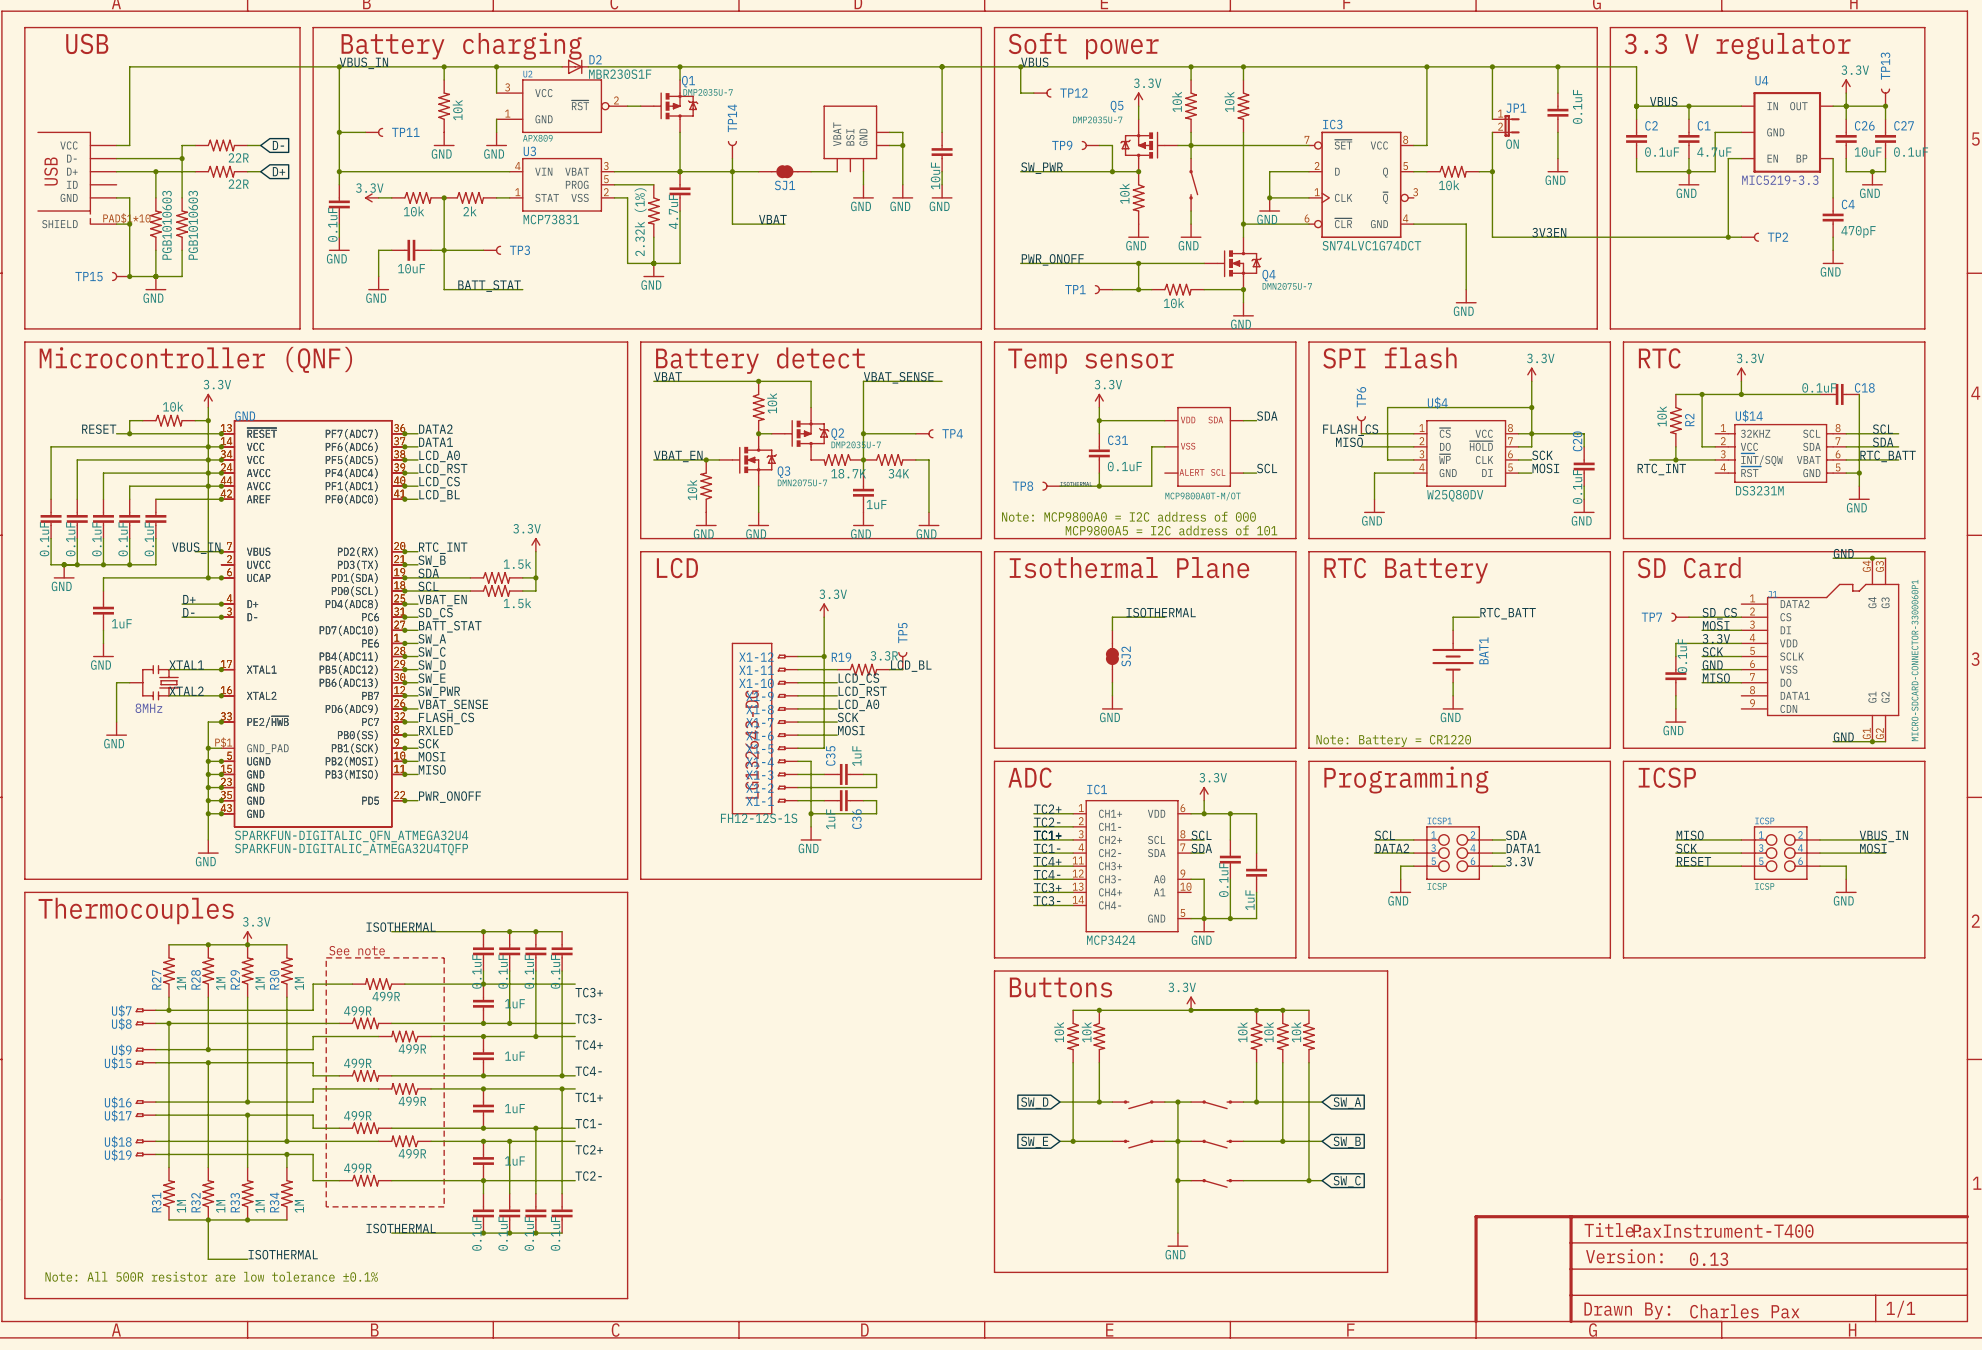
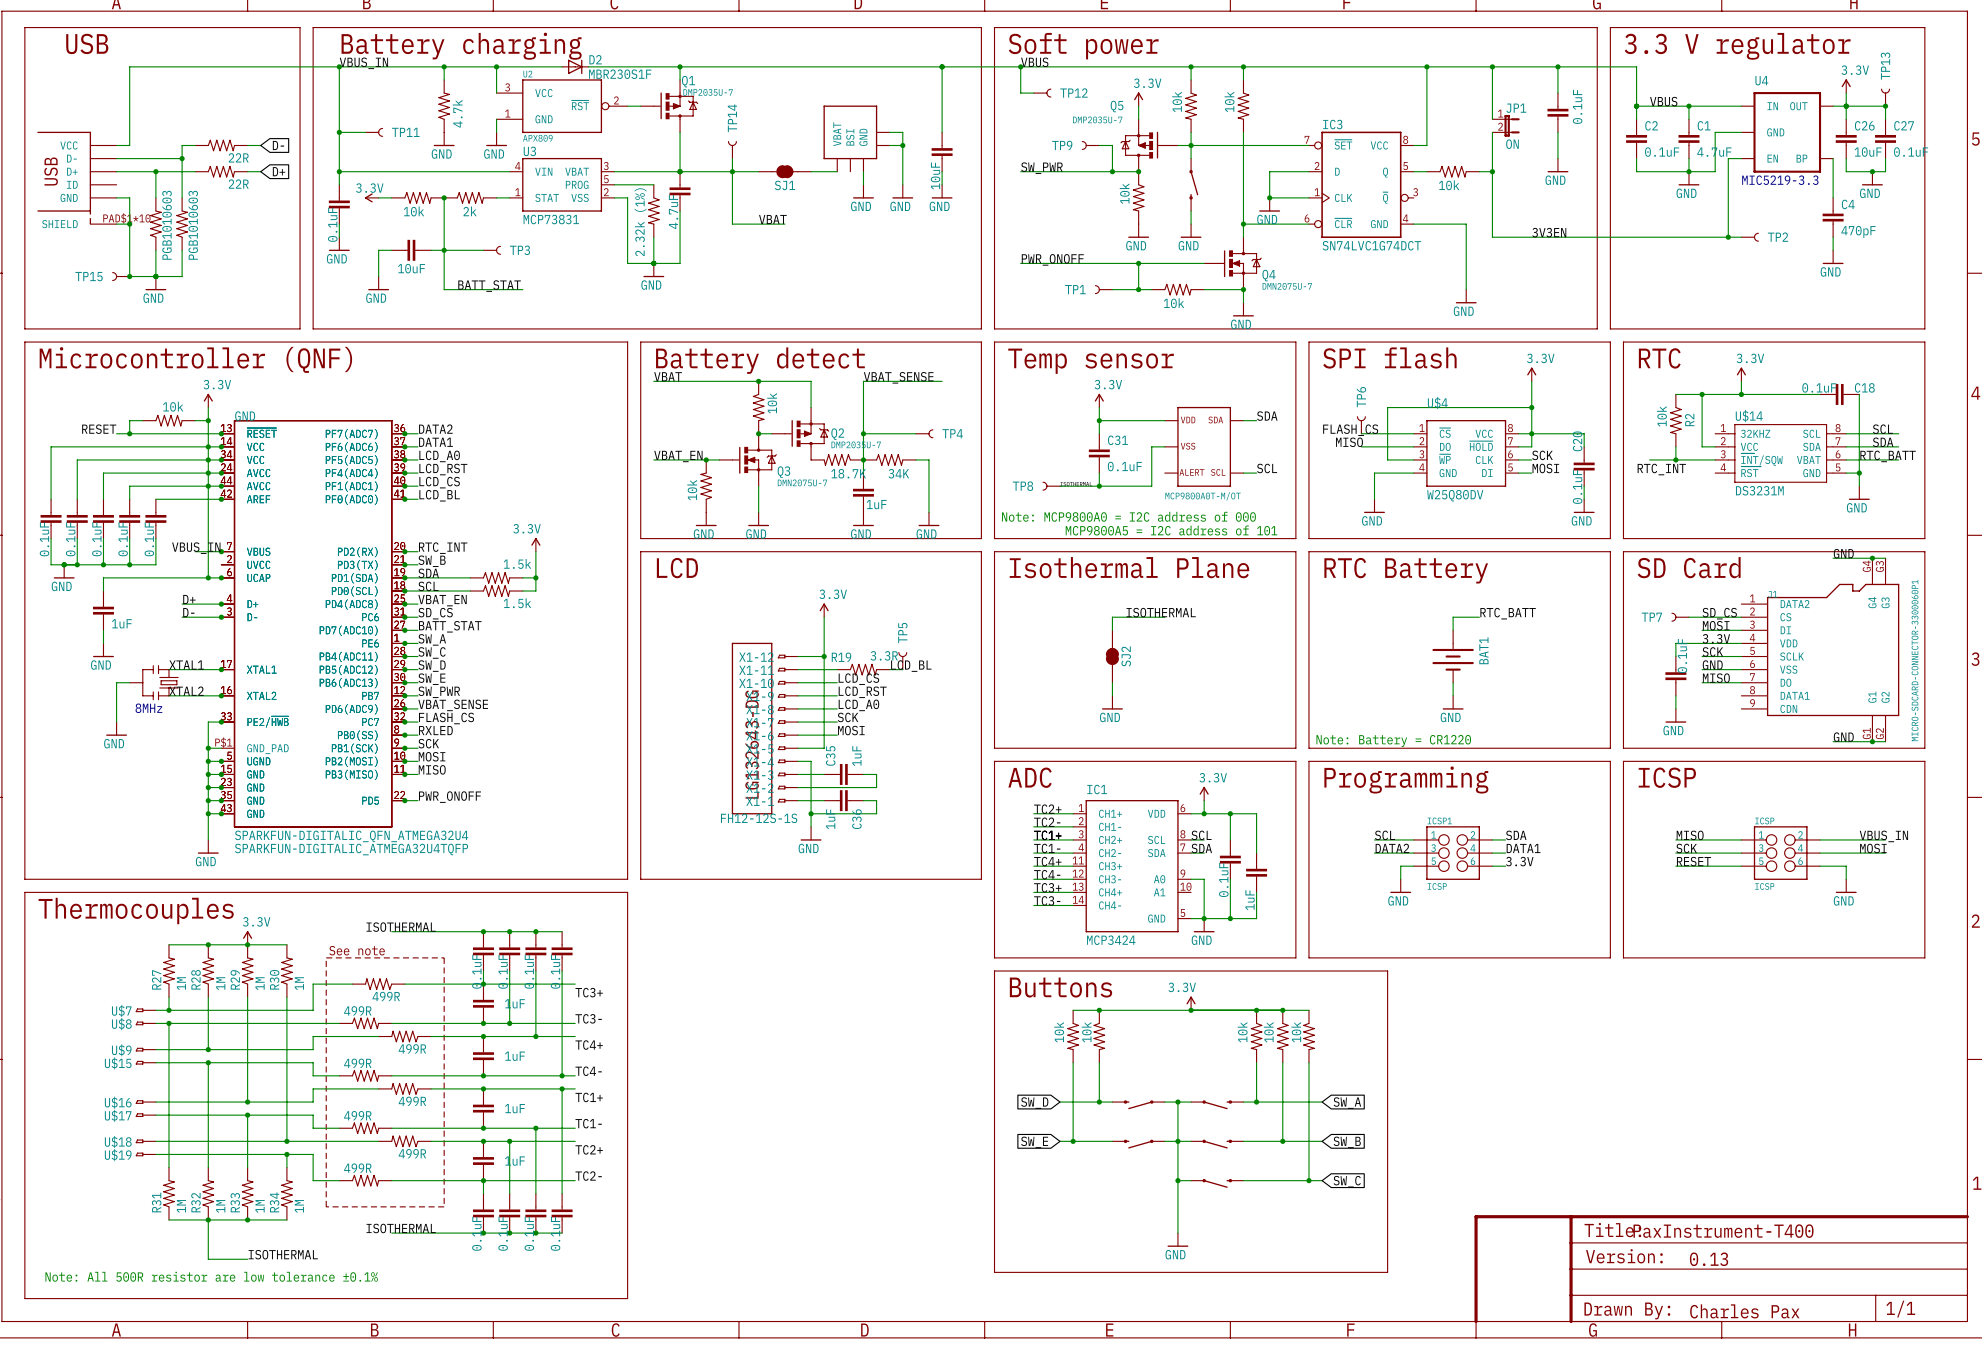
part value: 10k (457, 110) -> 4.7k (457, 113)

